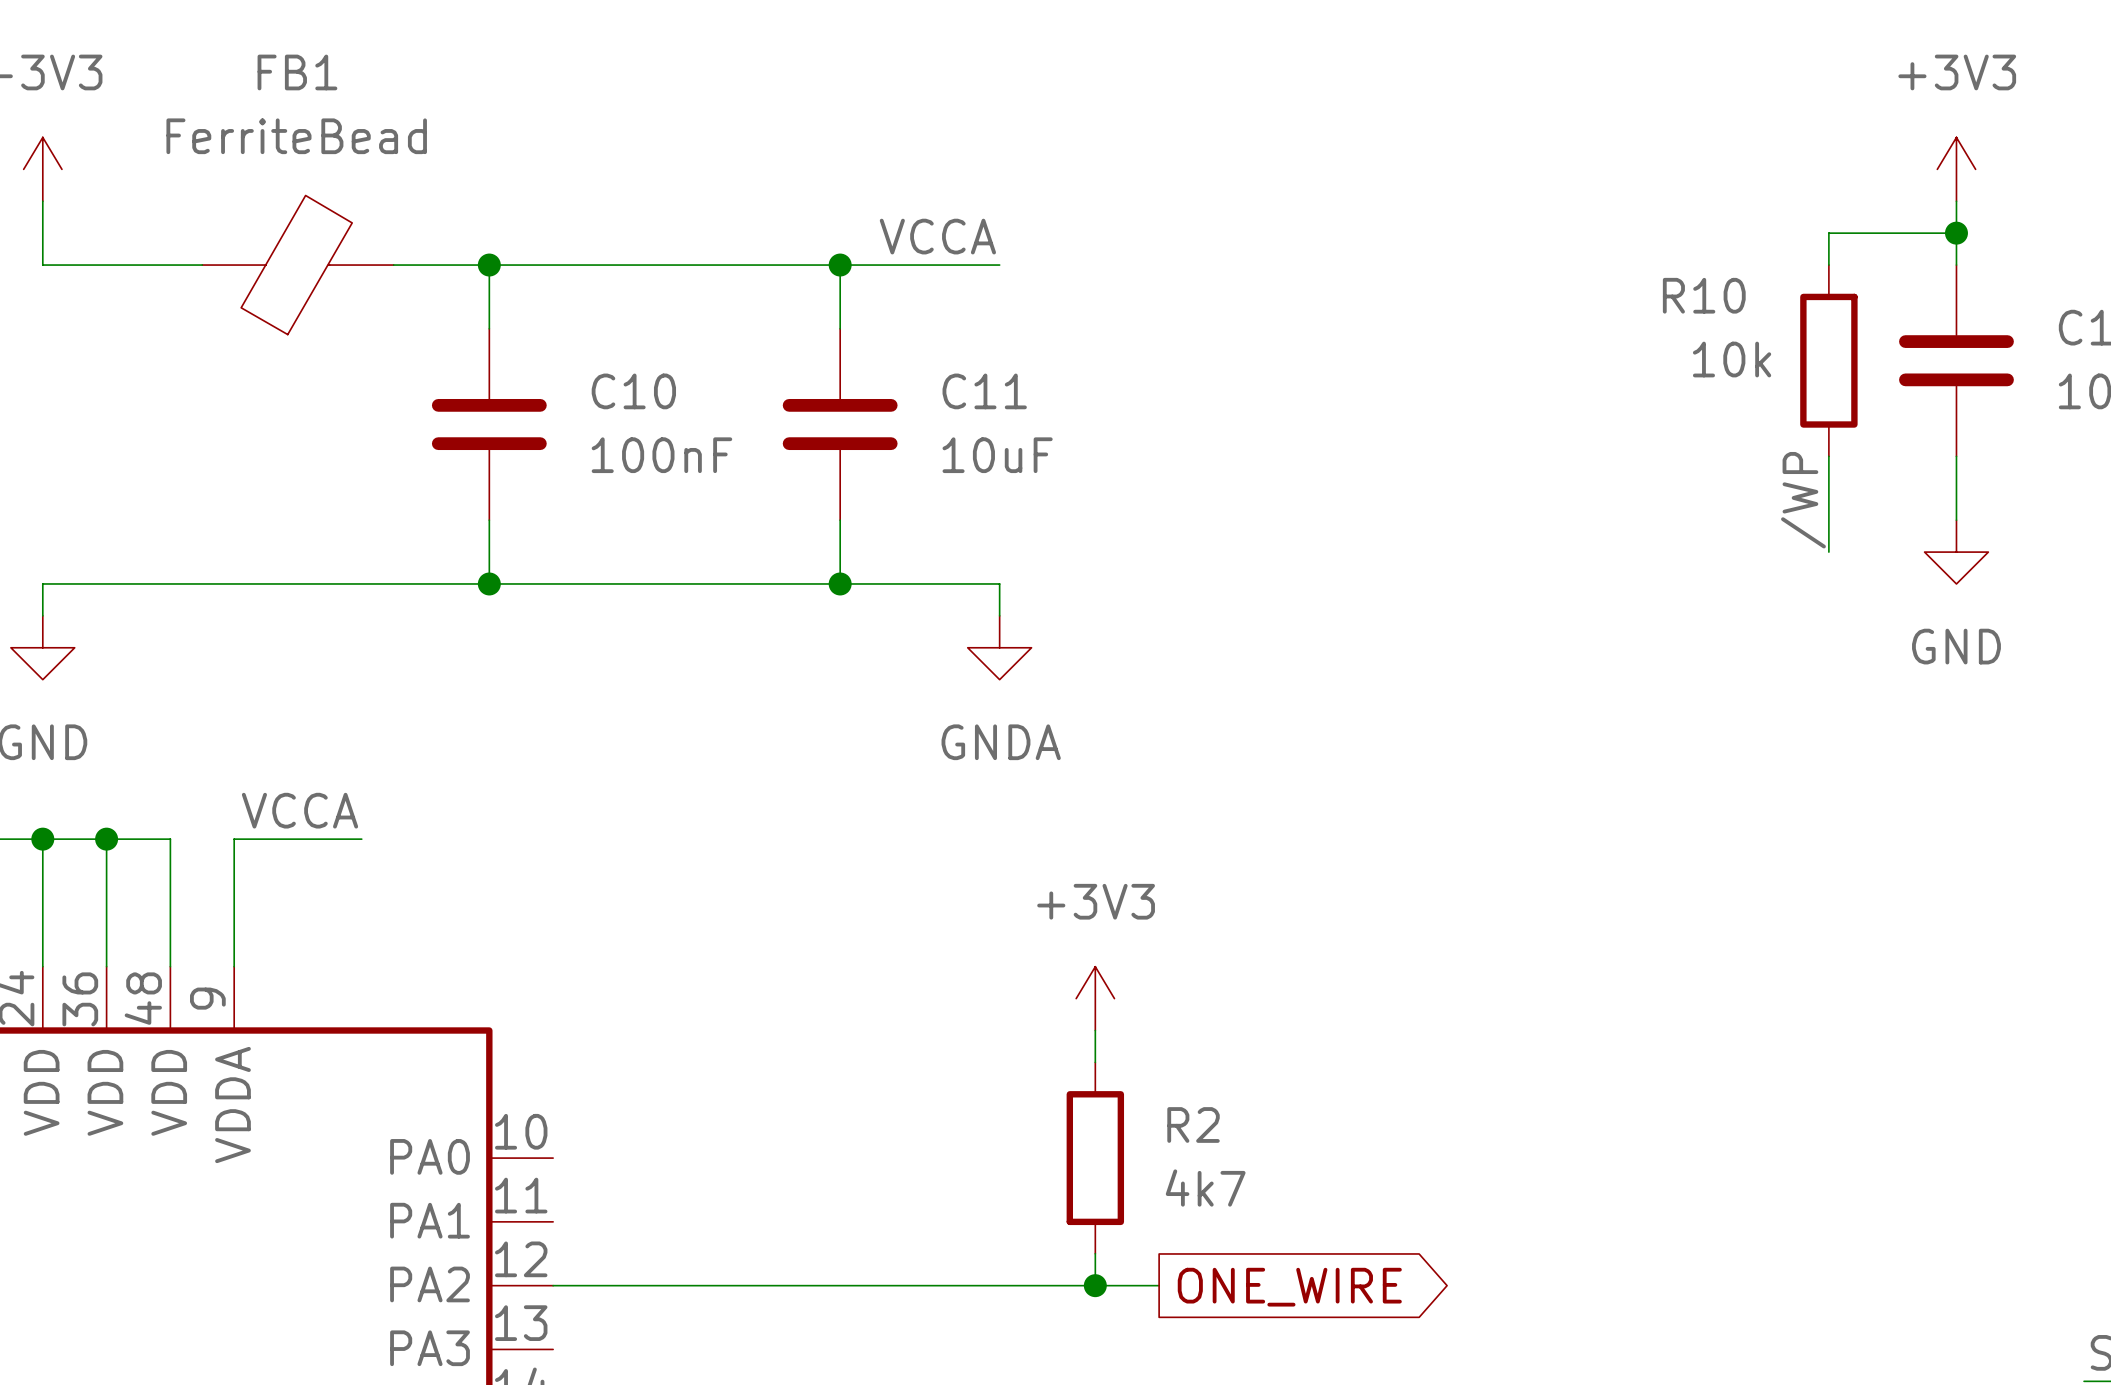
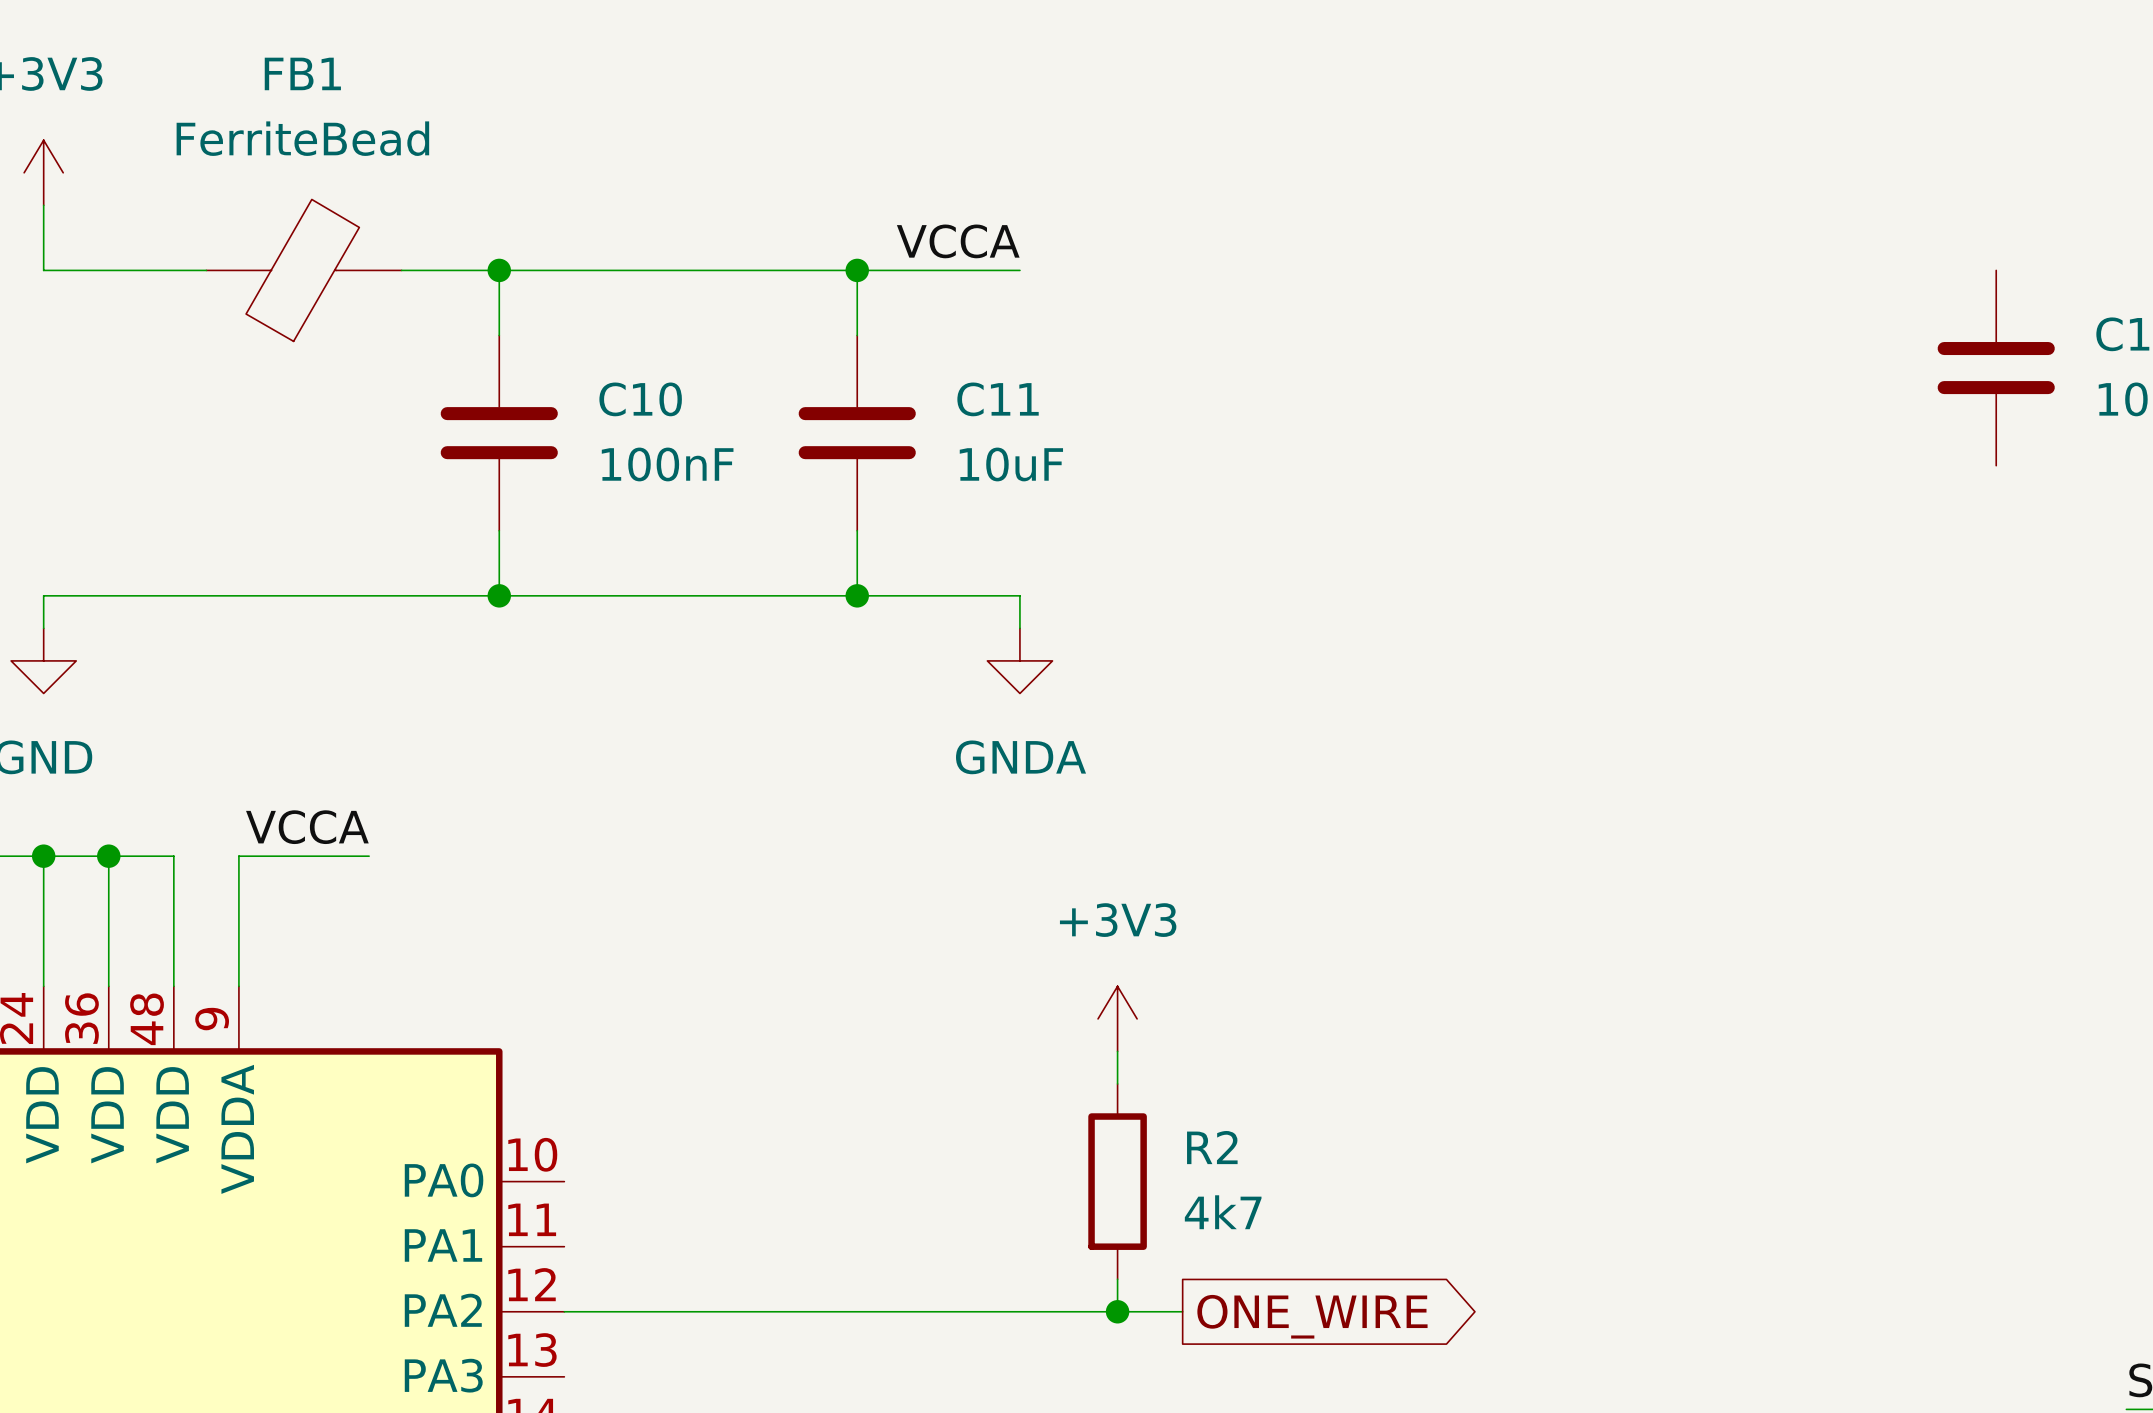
power symbol: +3V3 (1956, 169) -> none
wire: (1956, 201) (1956, 265) -> none
wire: (1956, 233) (1828, 233) (1828, 265) -> none
junction: (1956, 233) -> none
R10: 10k (1828, 360) -> none
wire: (1828, 456) (1828, 552) -> none
wire: (1956, 456) (1956, 520) -> none
label: /WP (1803, 500) -> none
power symbol: GND (1956, 552) -> none

